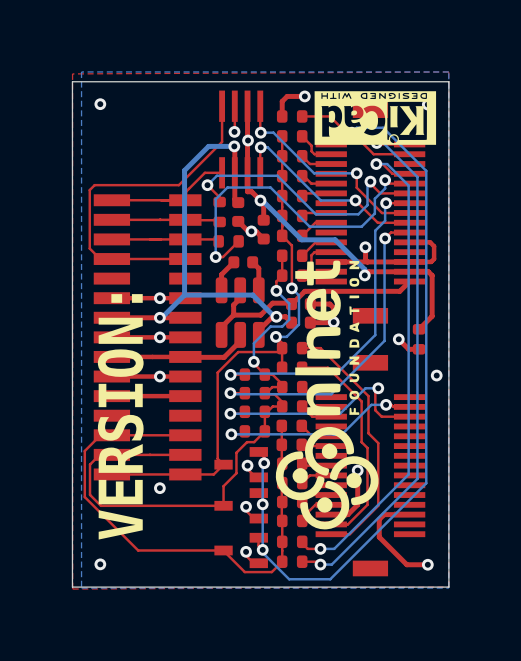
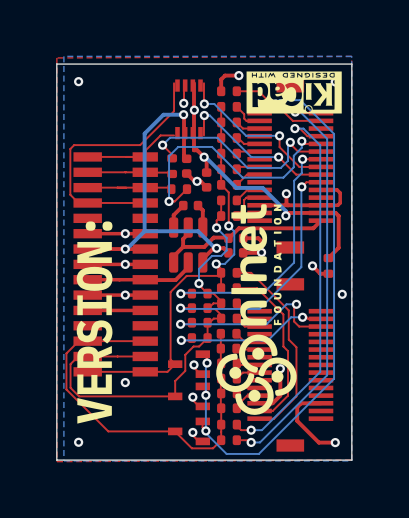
part footprint: [219, 90, 264, 189] -> [175, 79, 203, 140]

